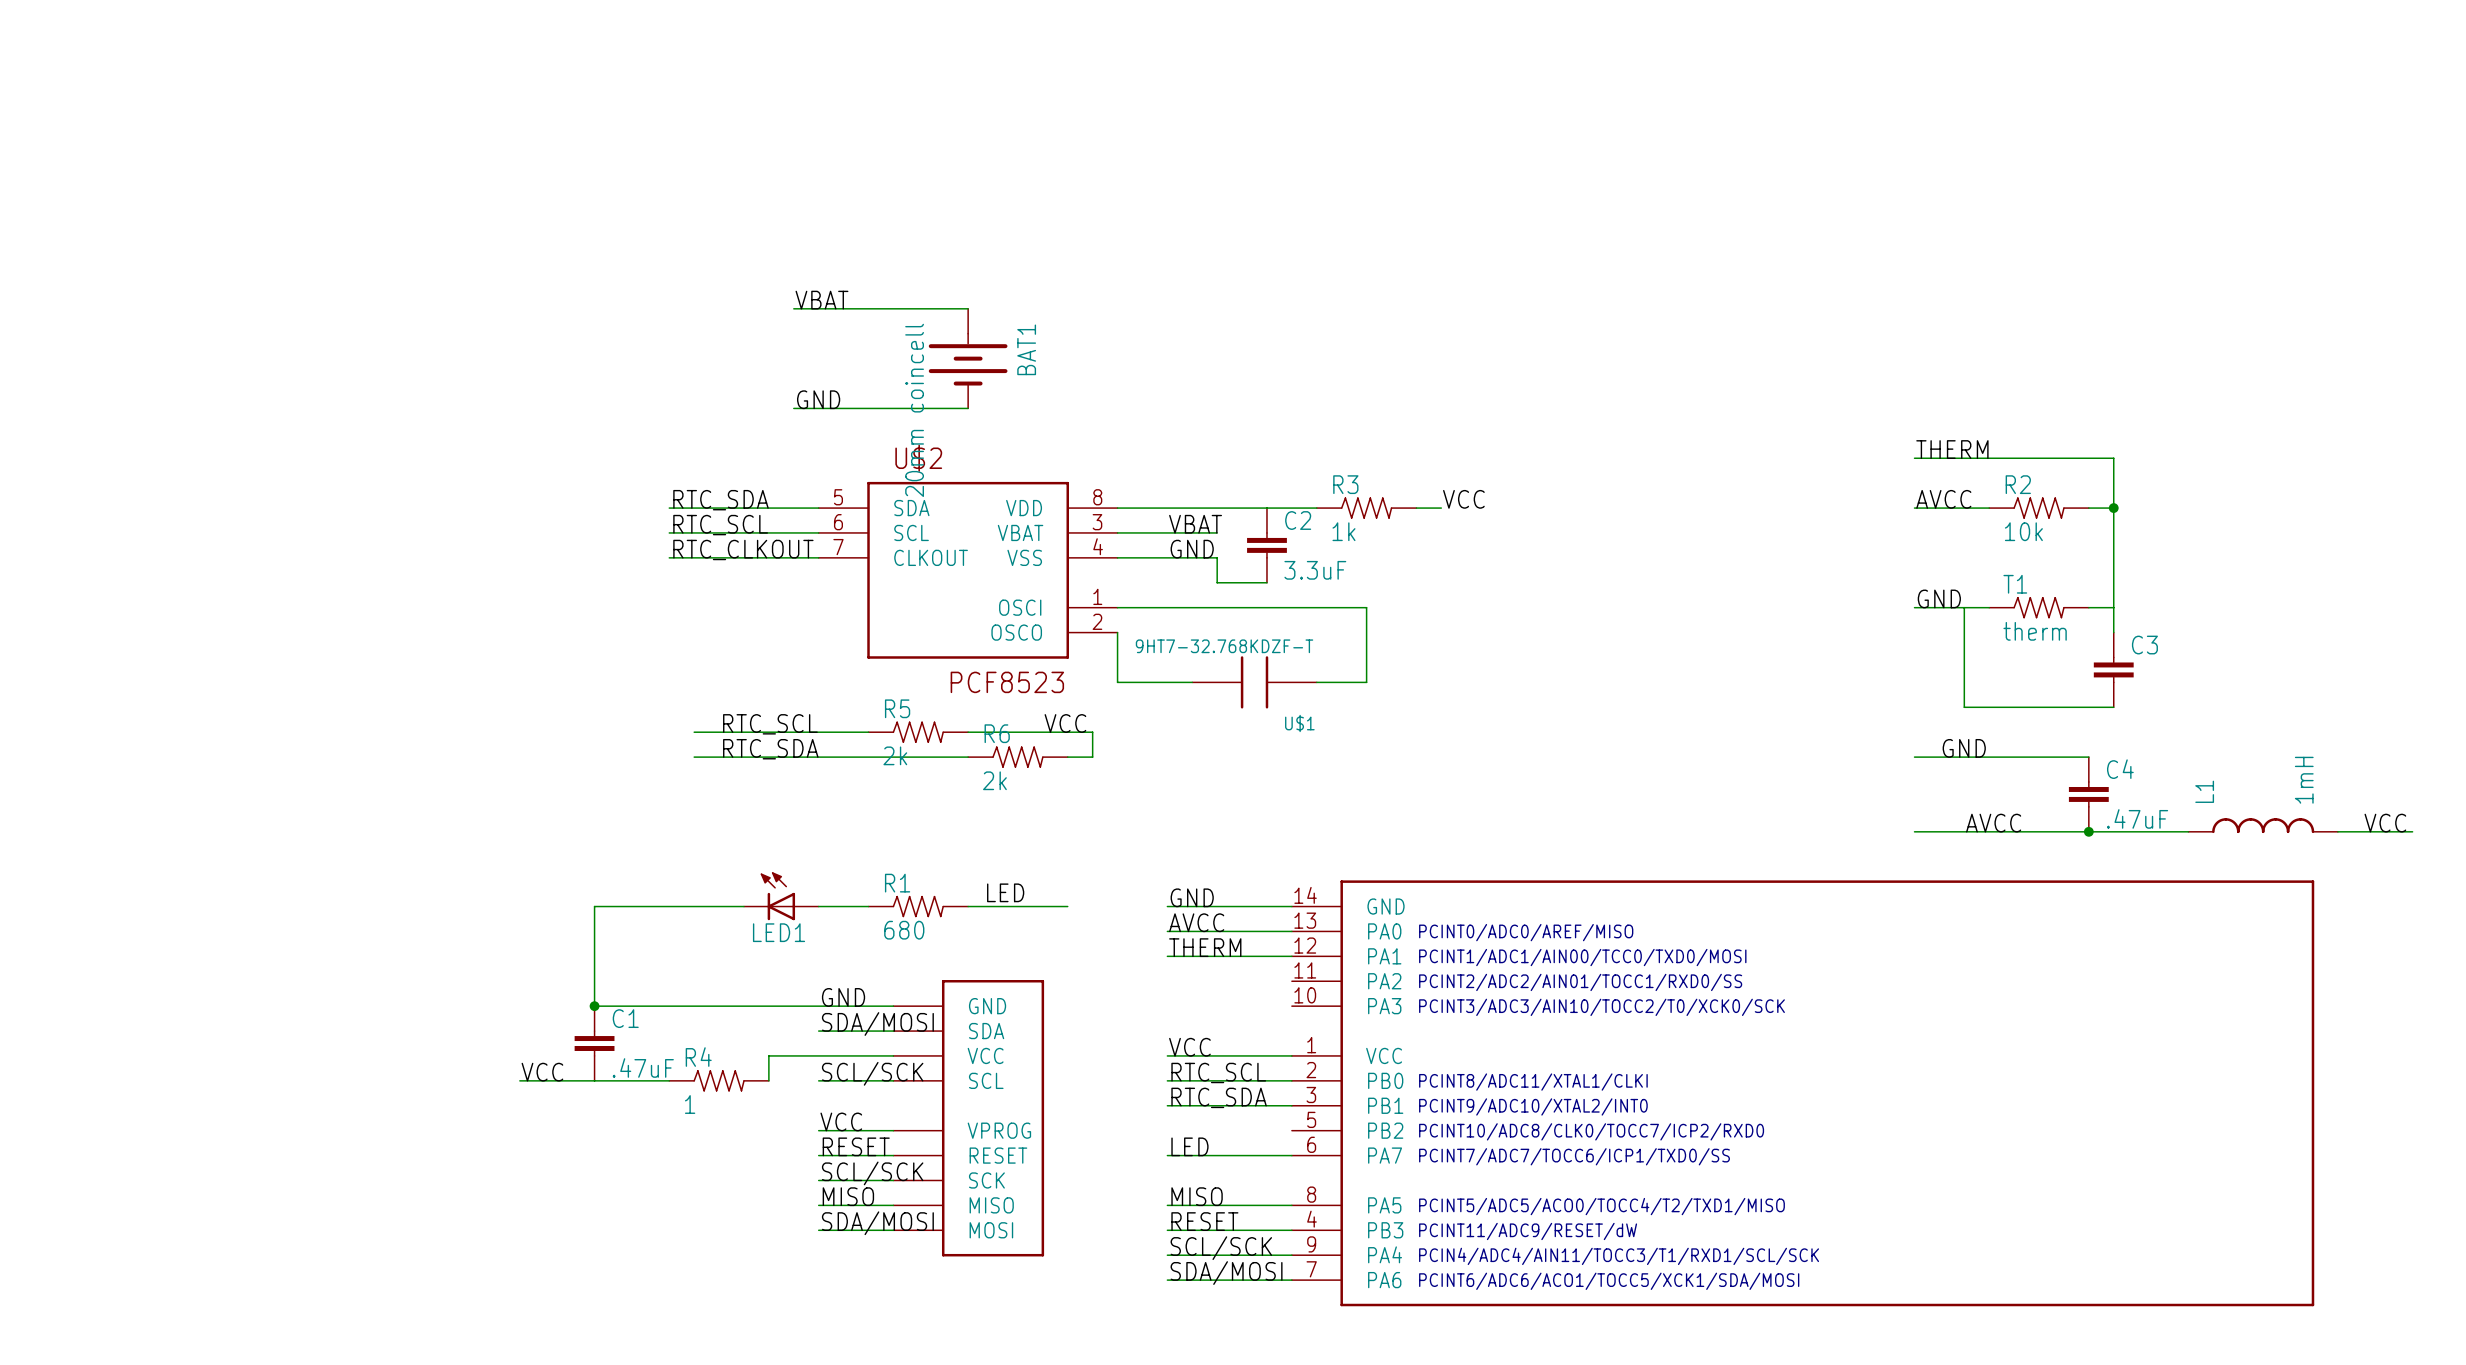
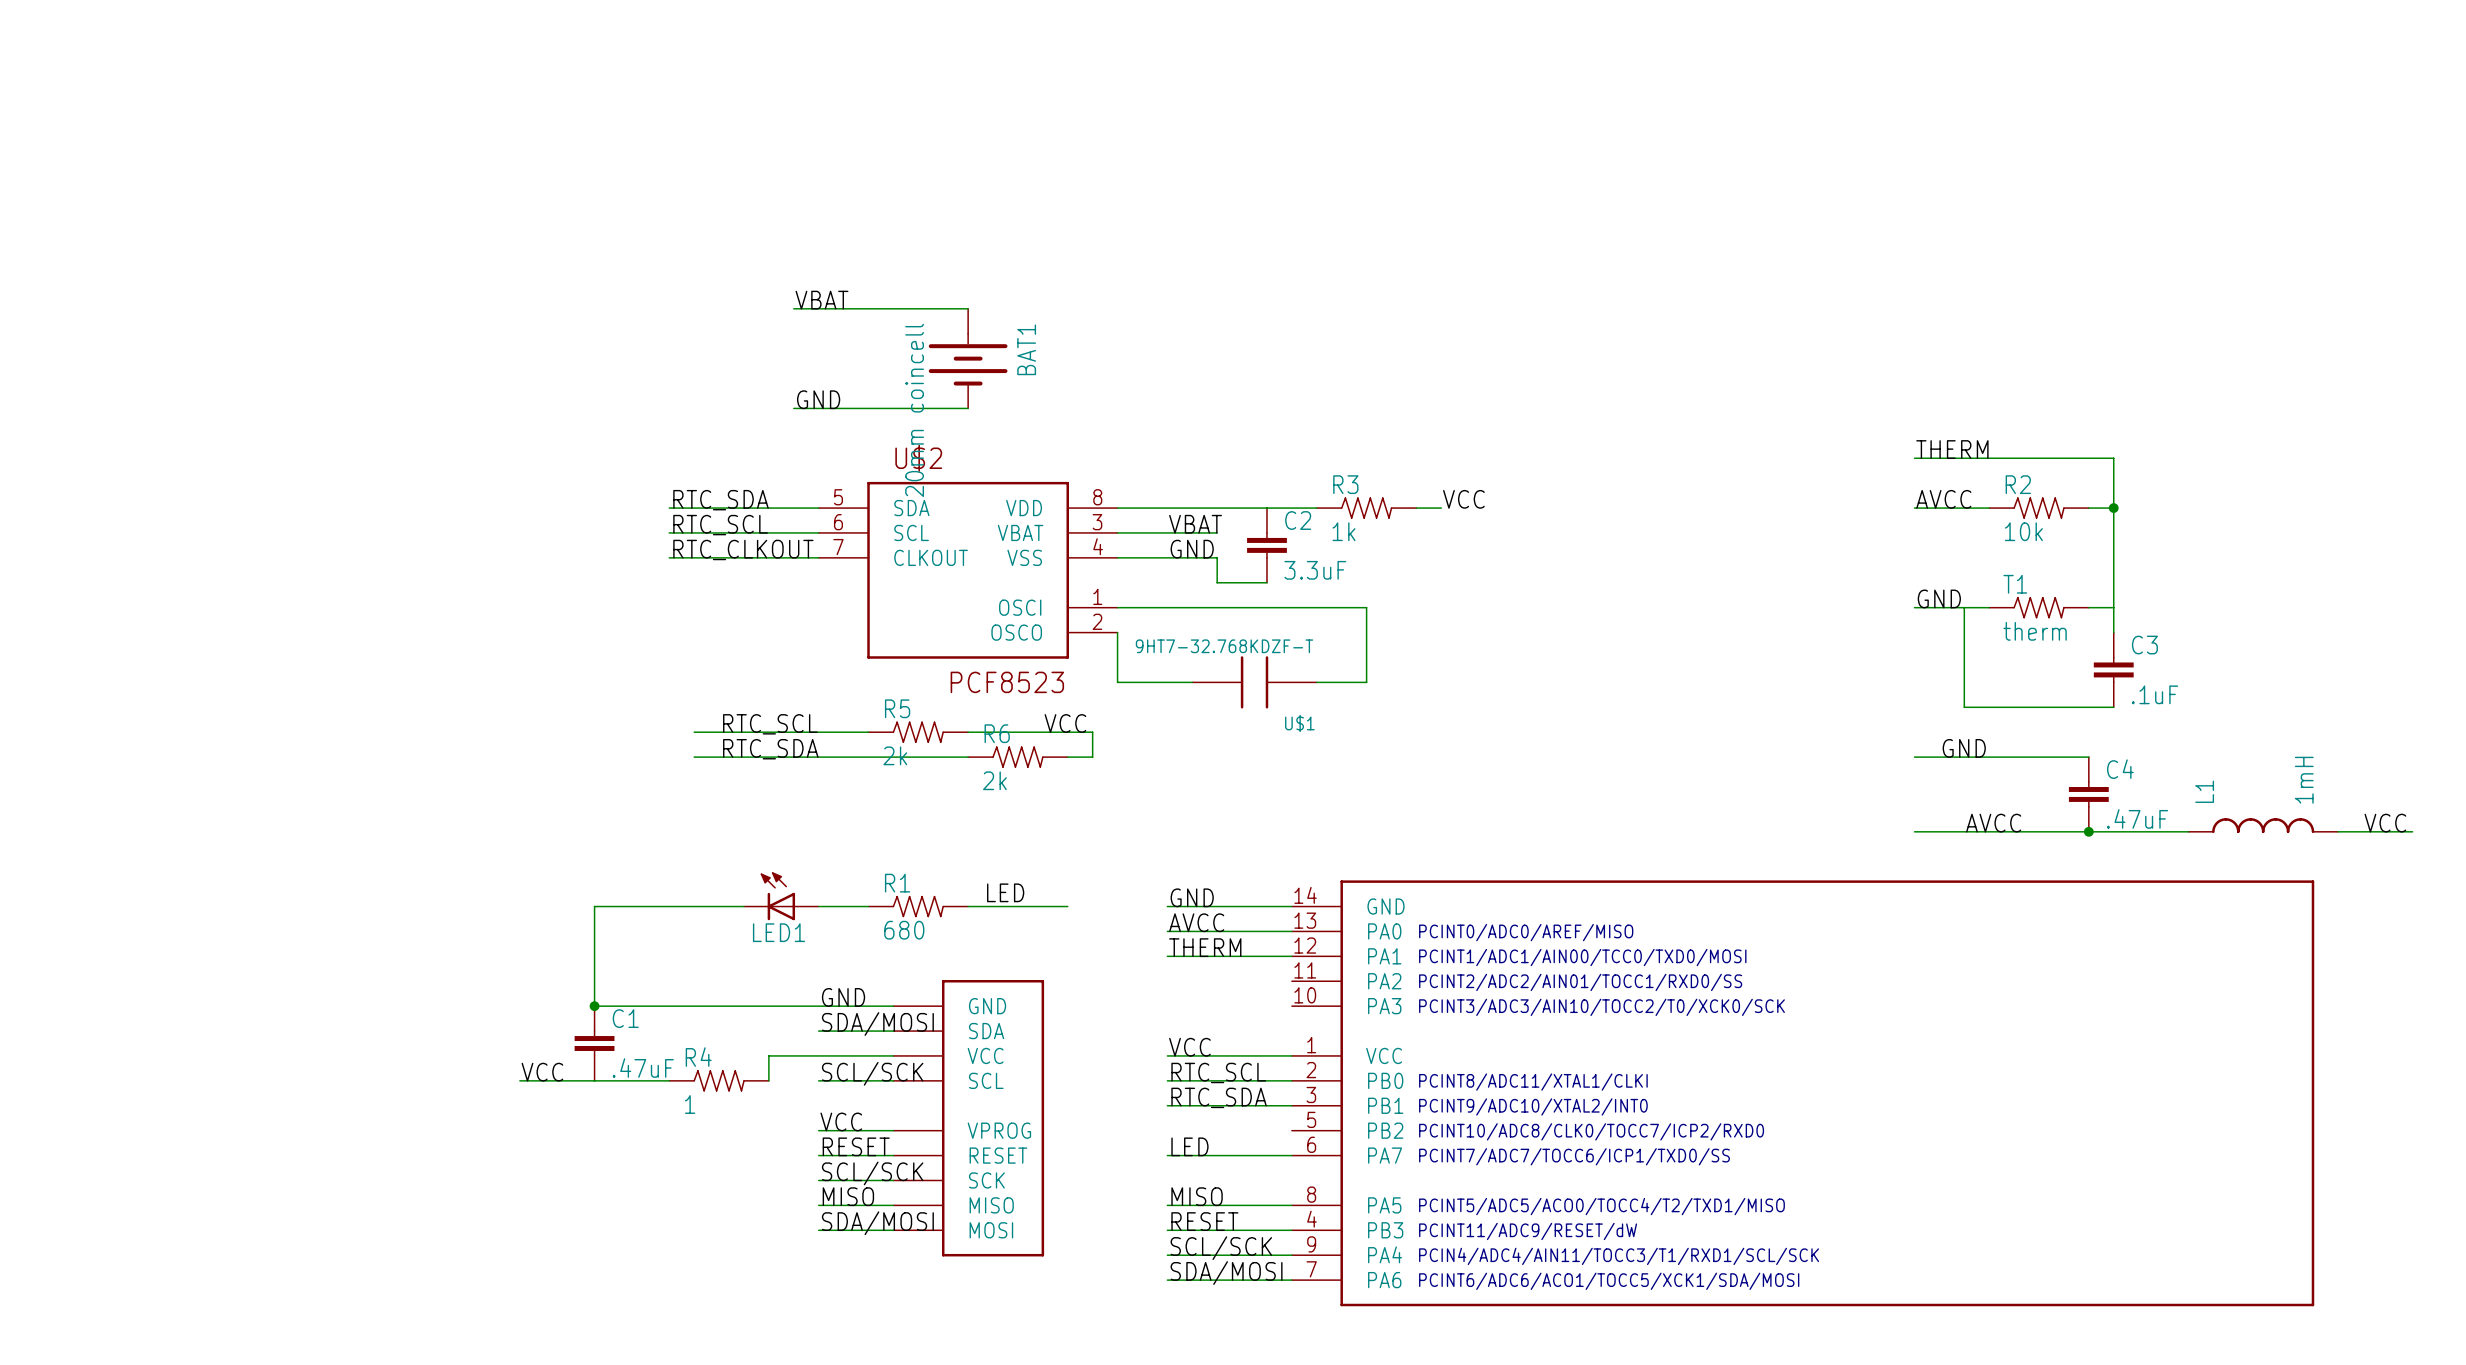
C3 value: none -> .1uF (2155, 694)

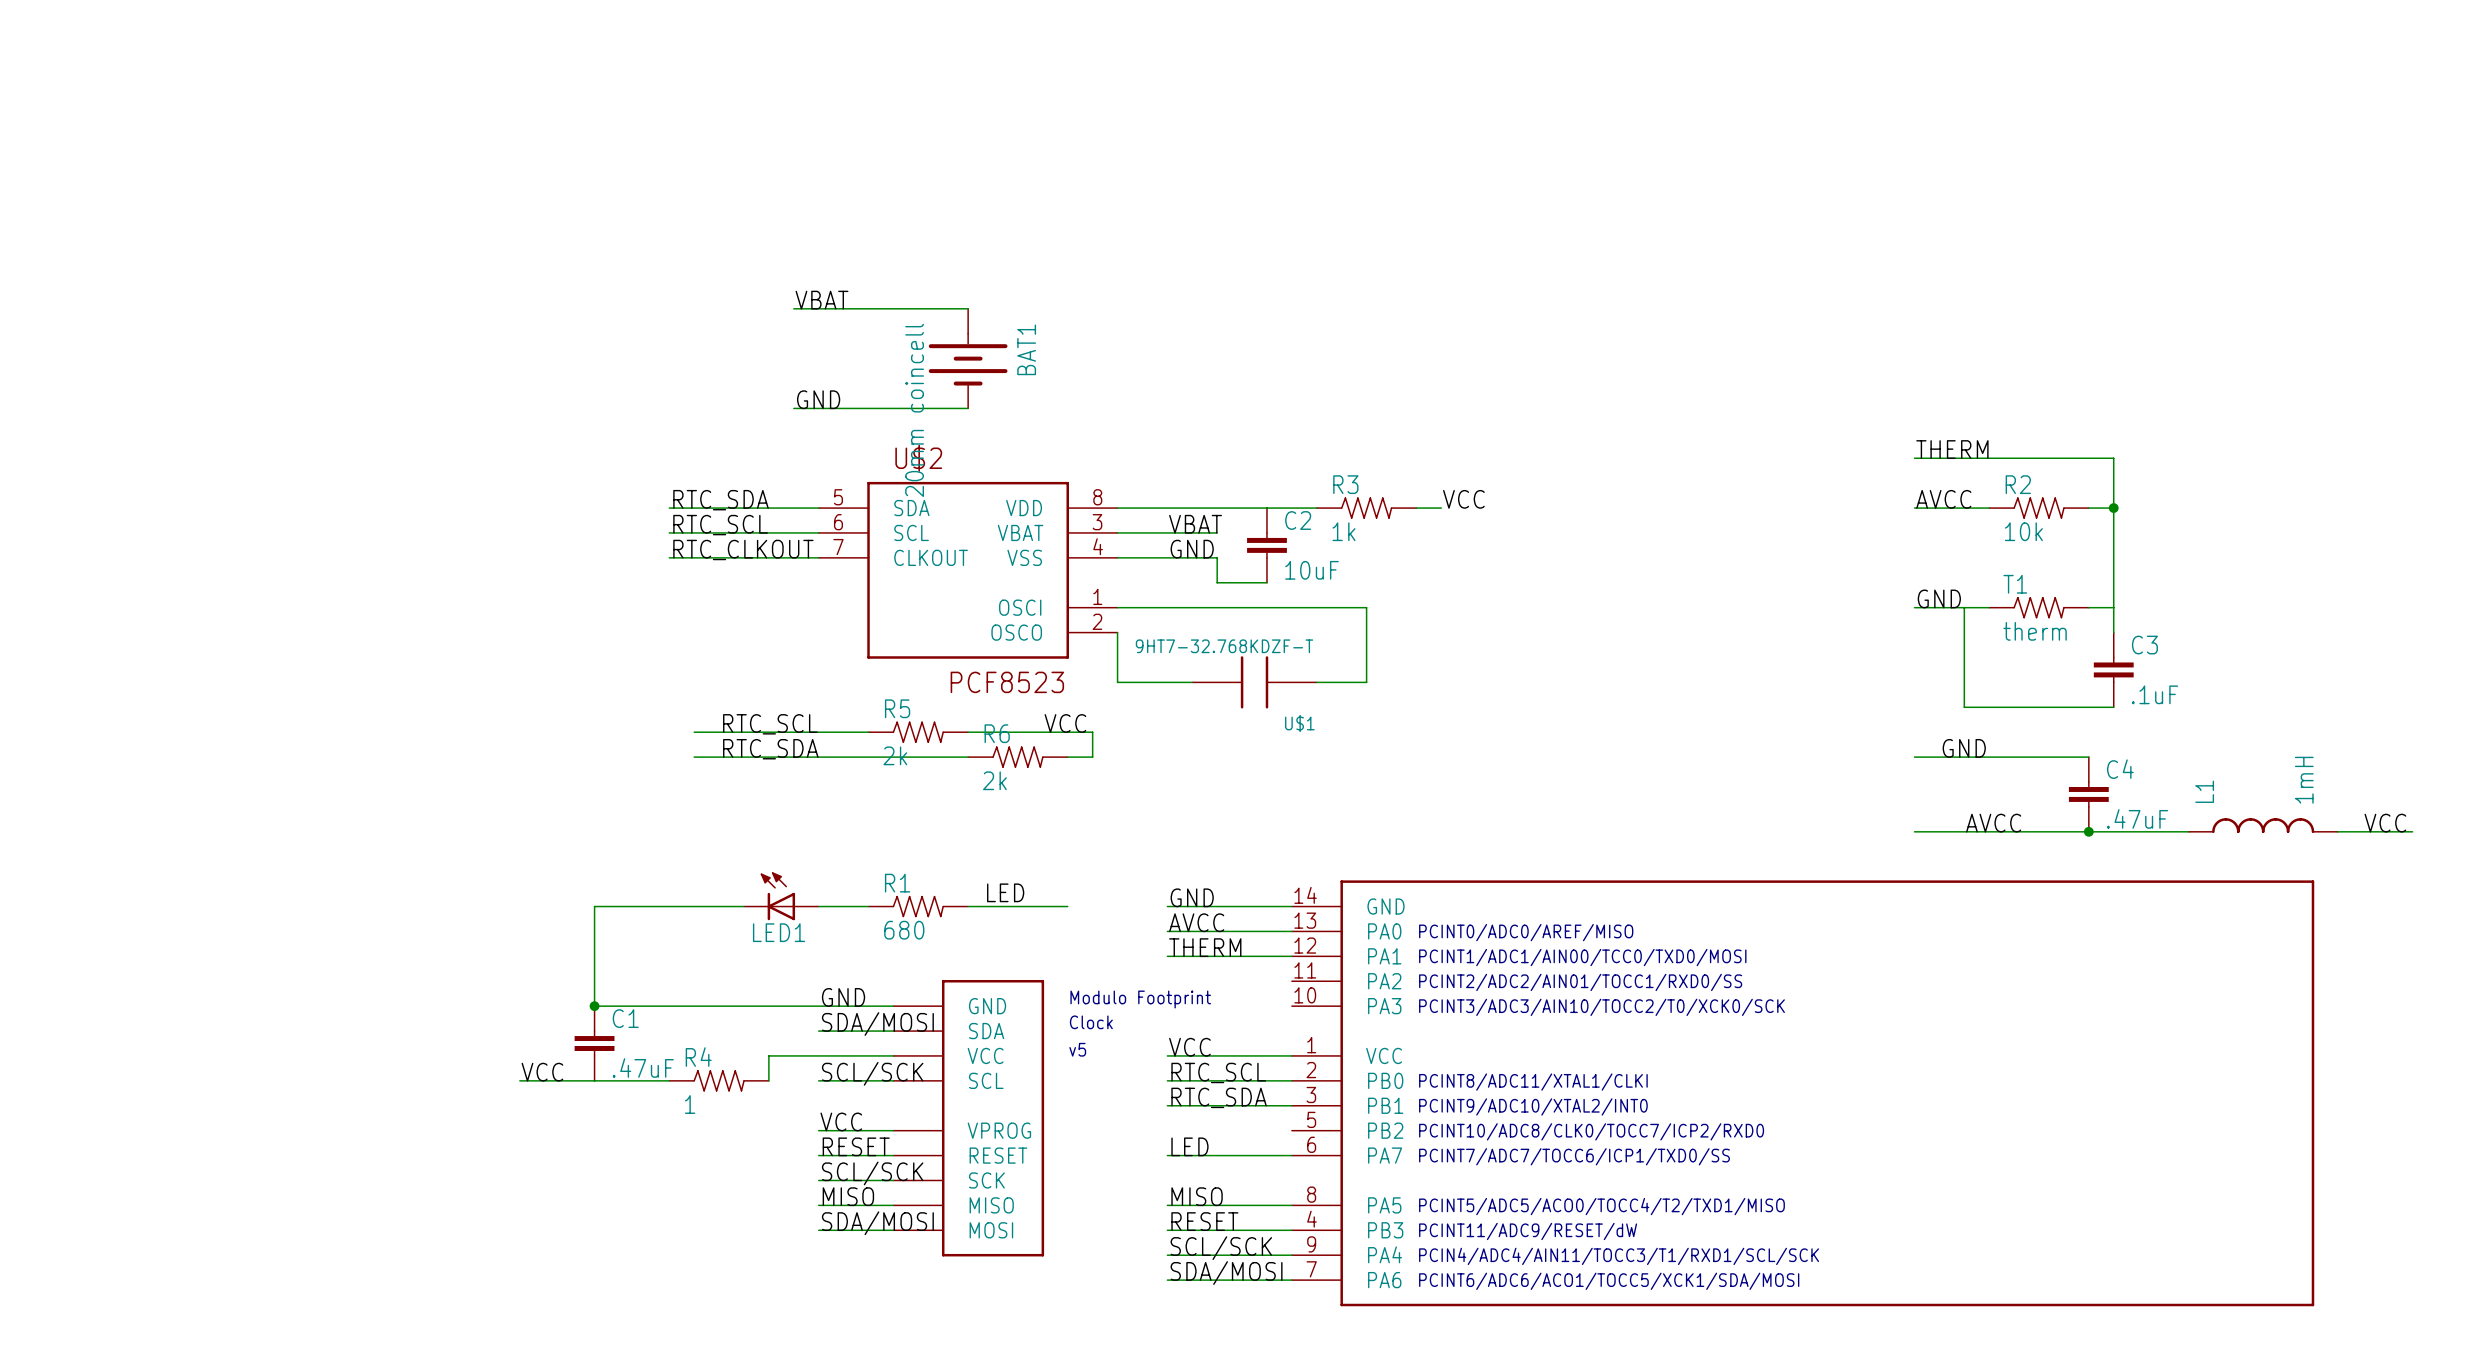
C2 value: 3.3uF (1315, 570) -> 10uF (1311, 570)
part text: none -> Modulo Footprint (1140, 999)
part text: none -> Clock (1091, 1022)
part text: none -> v5 (1077, 1049)

